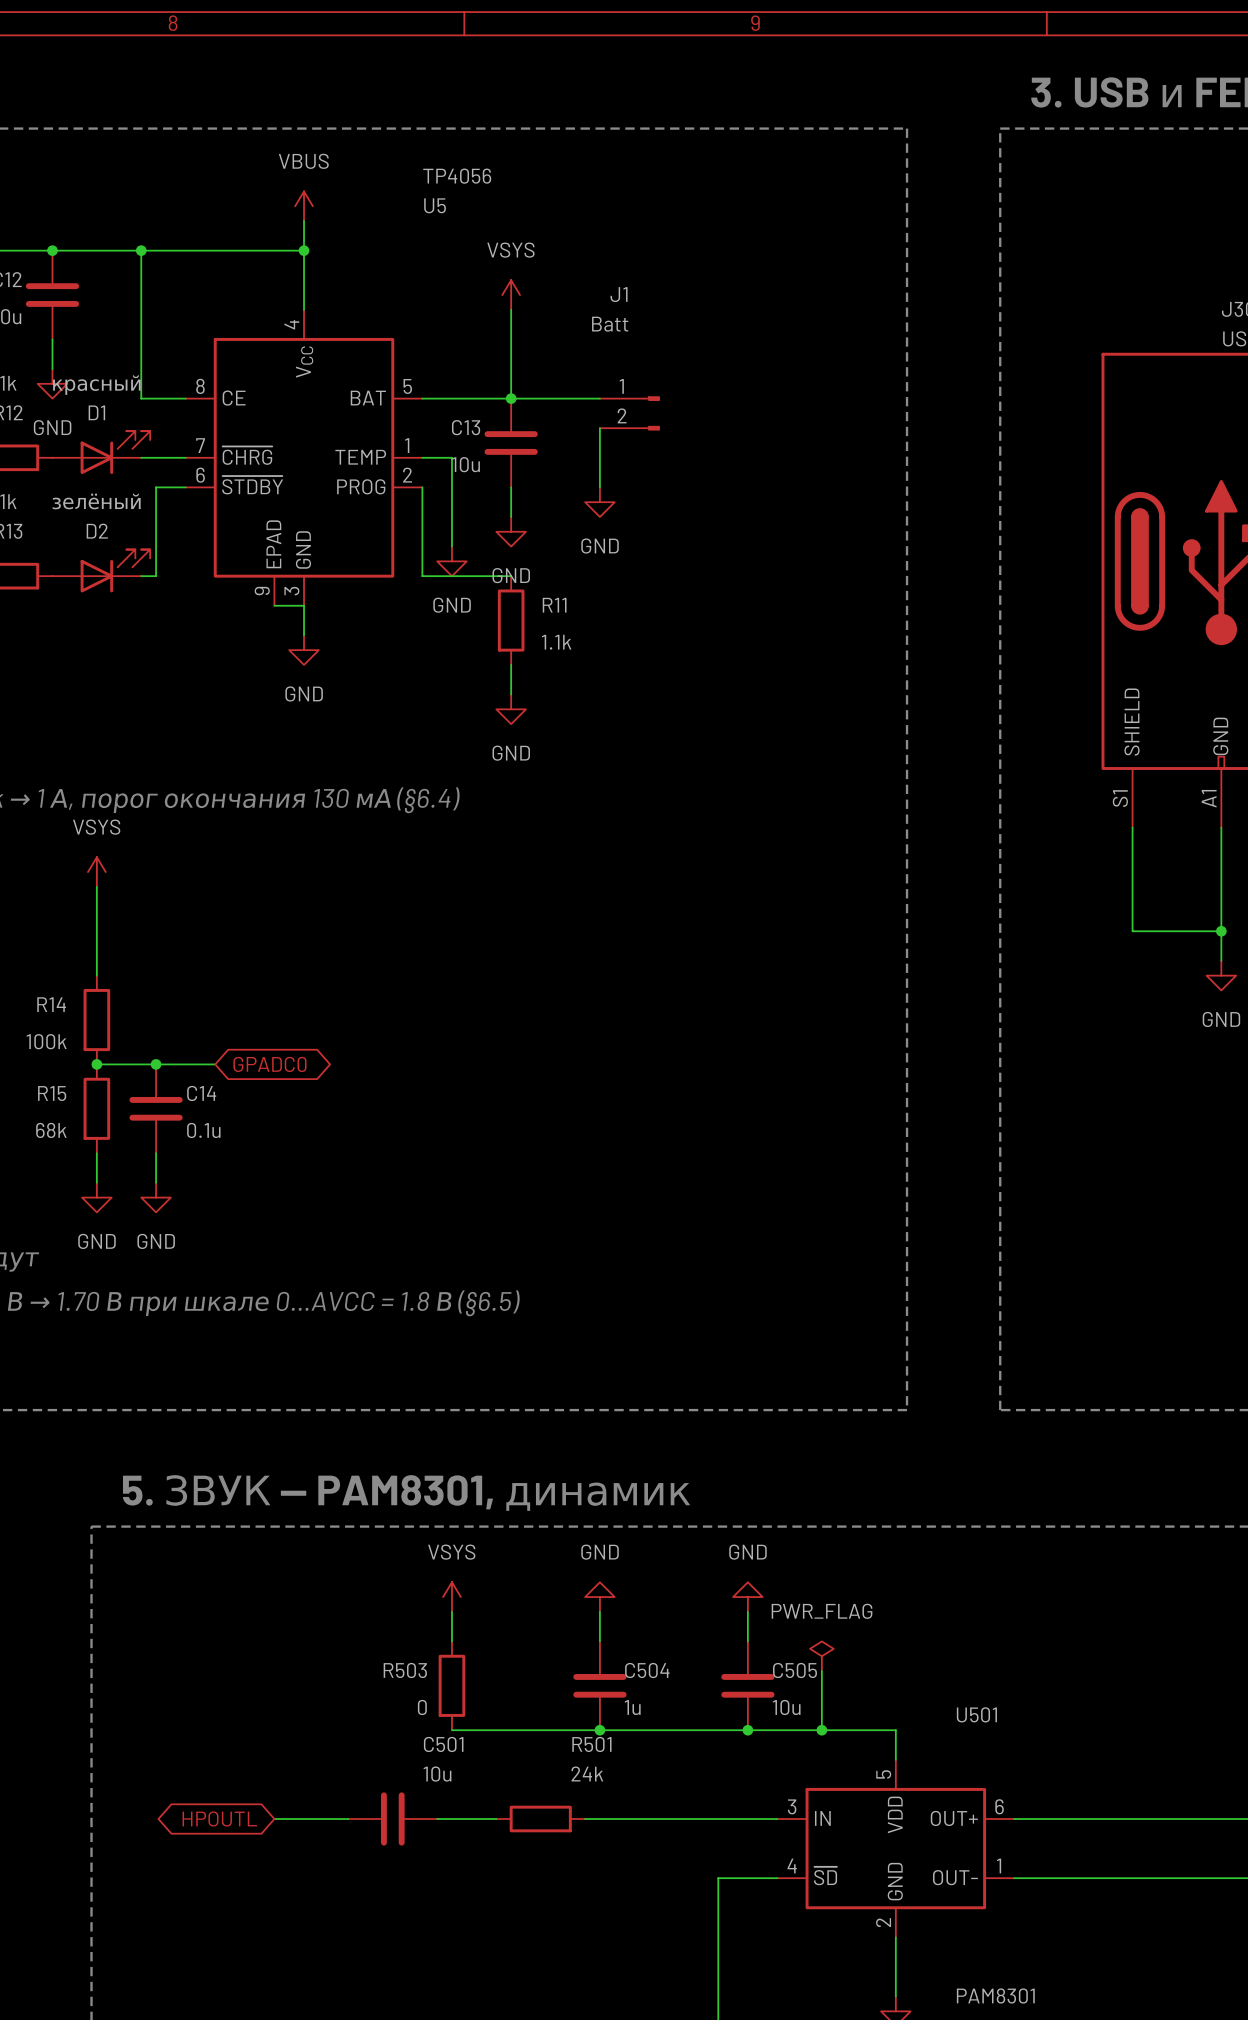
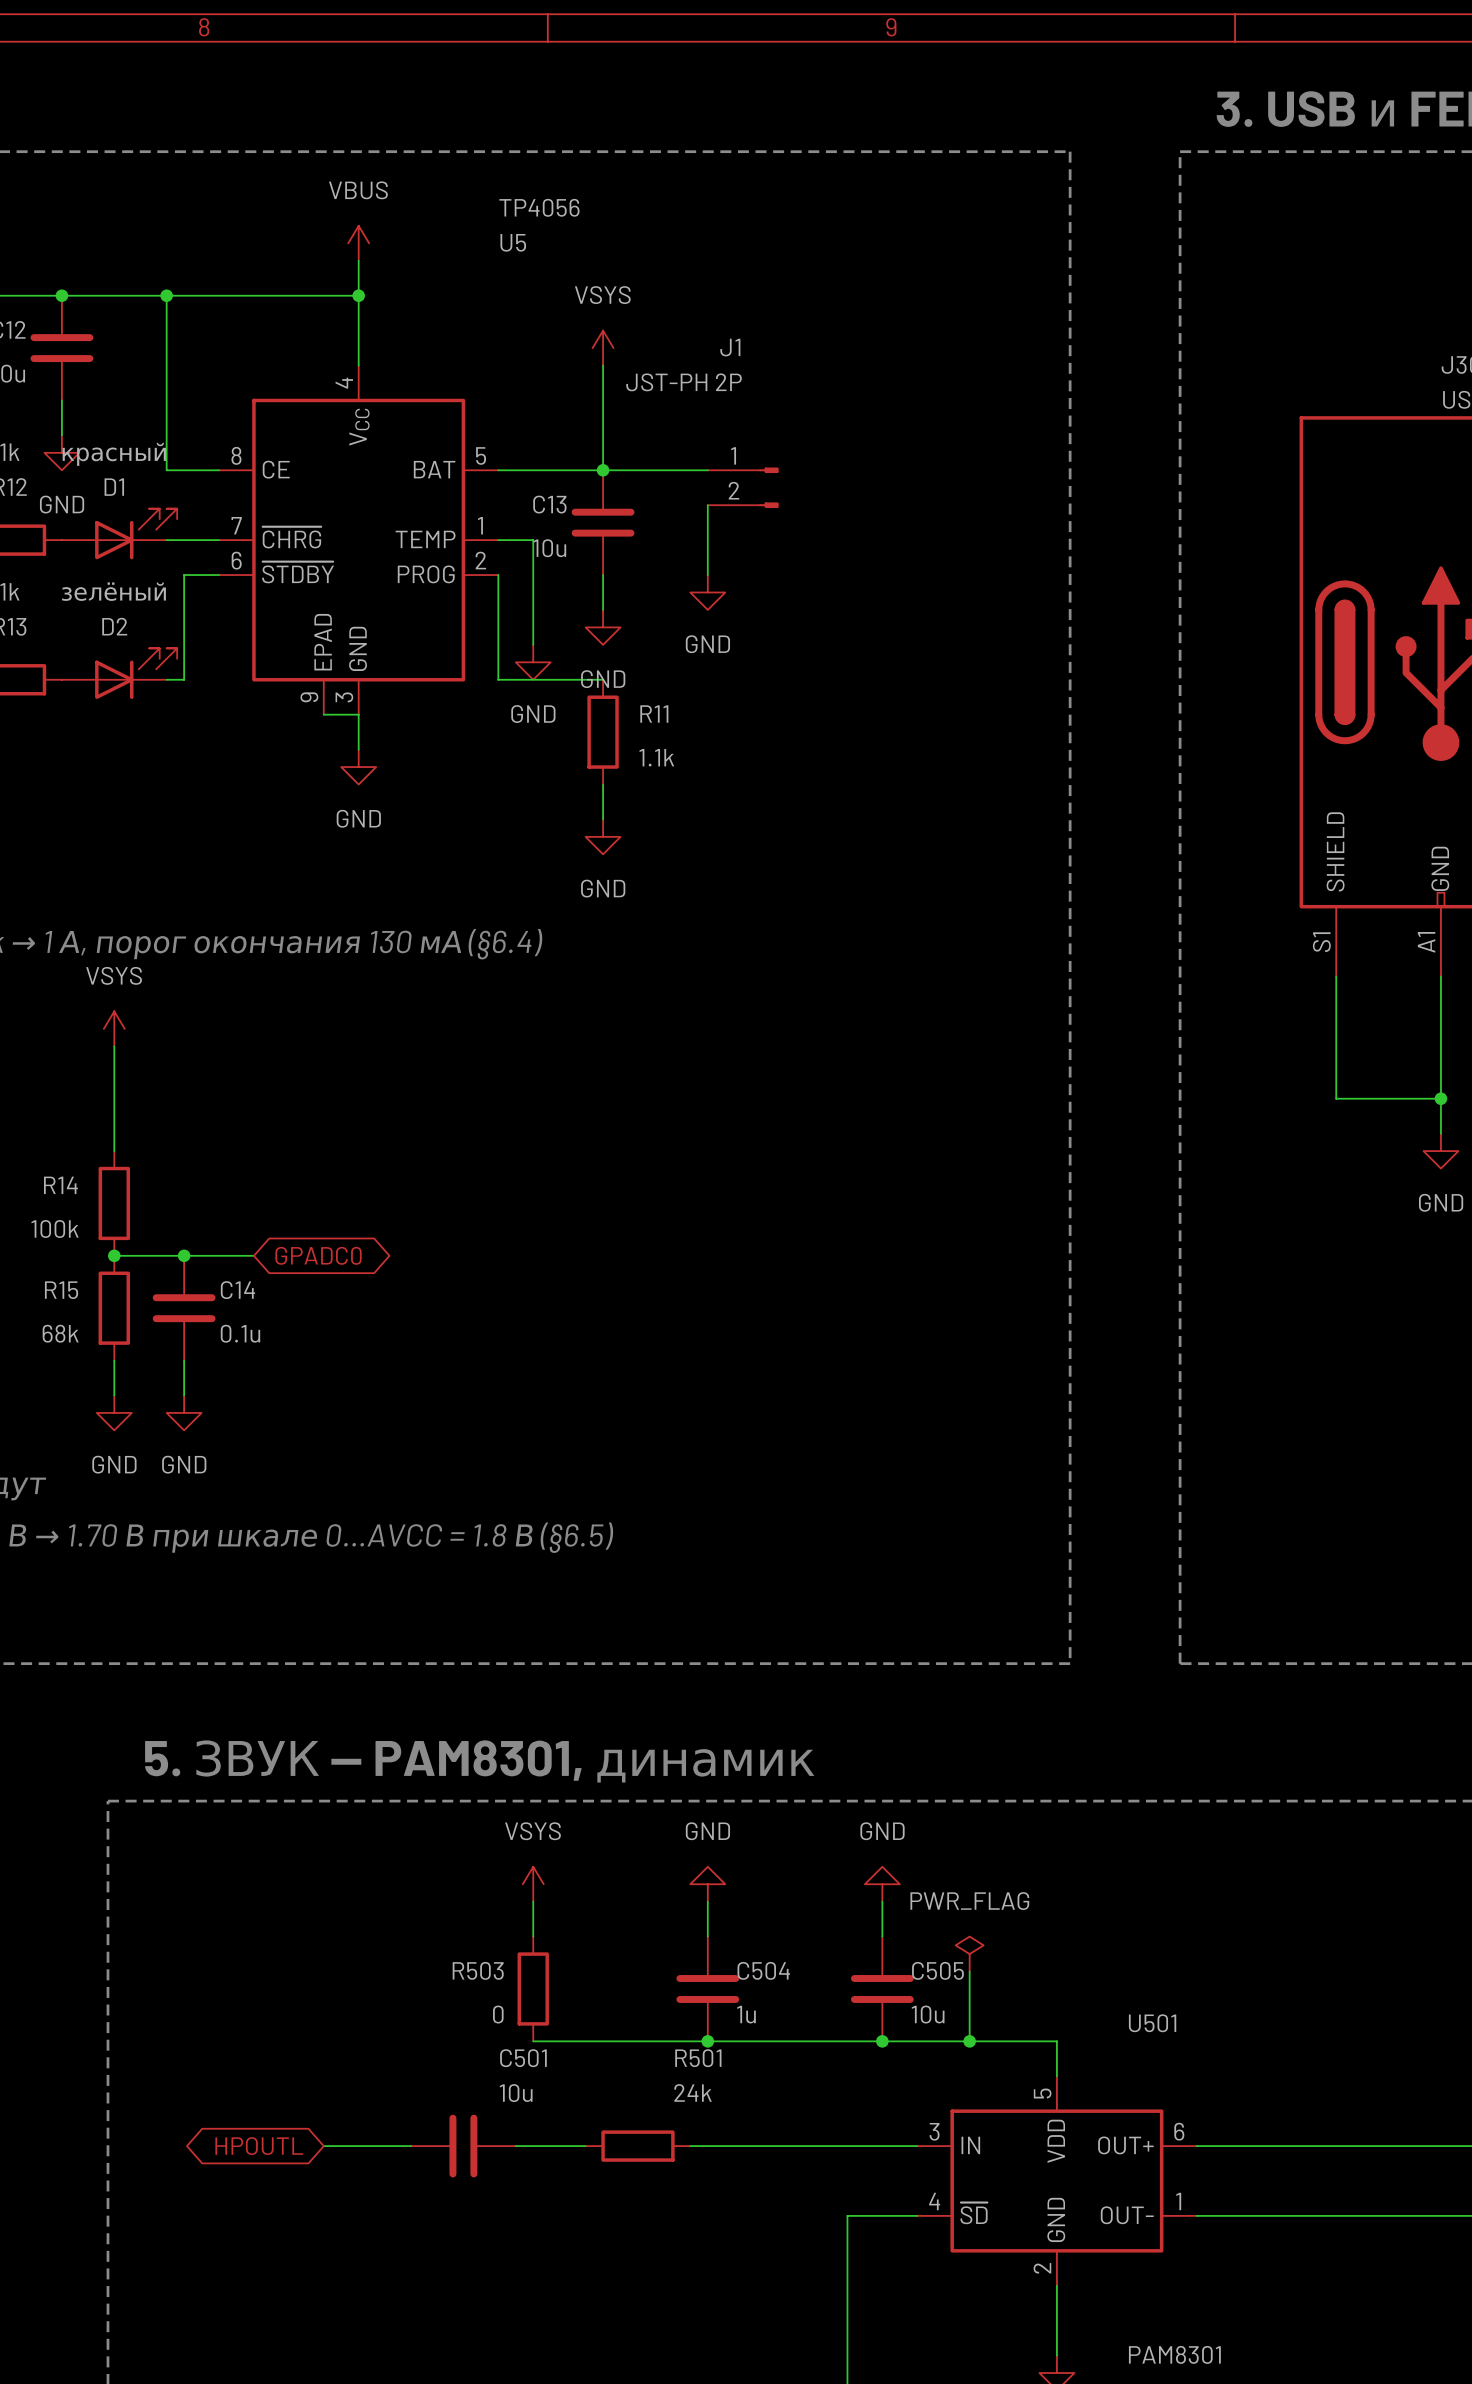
J1 value: Batt (610, 324) -> JST-PH 2P (684, 382)

